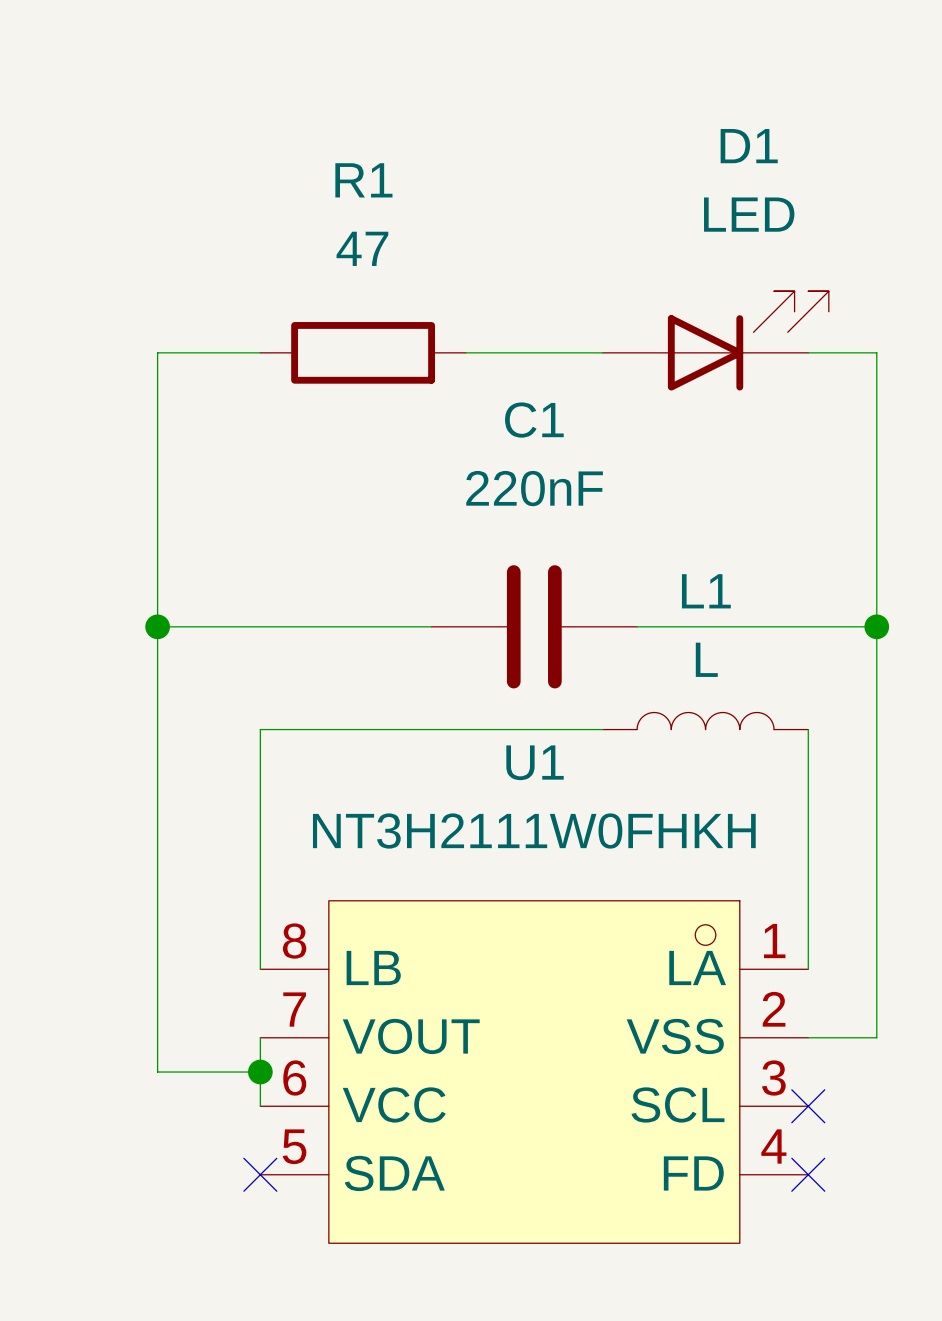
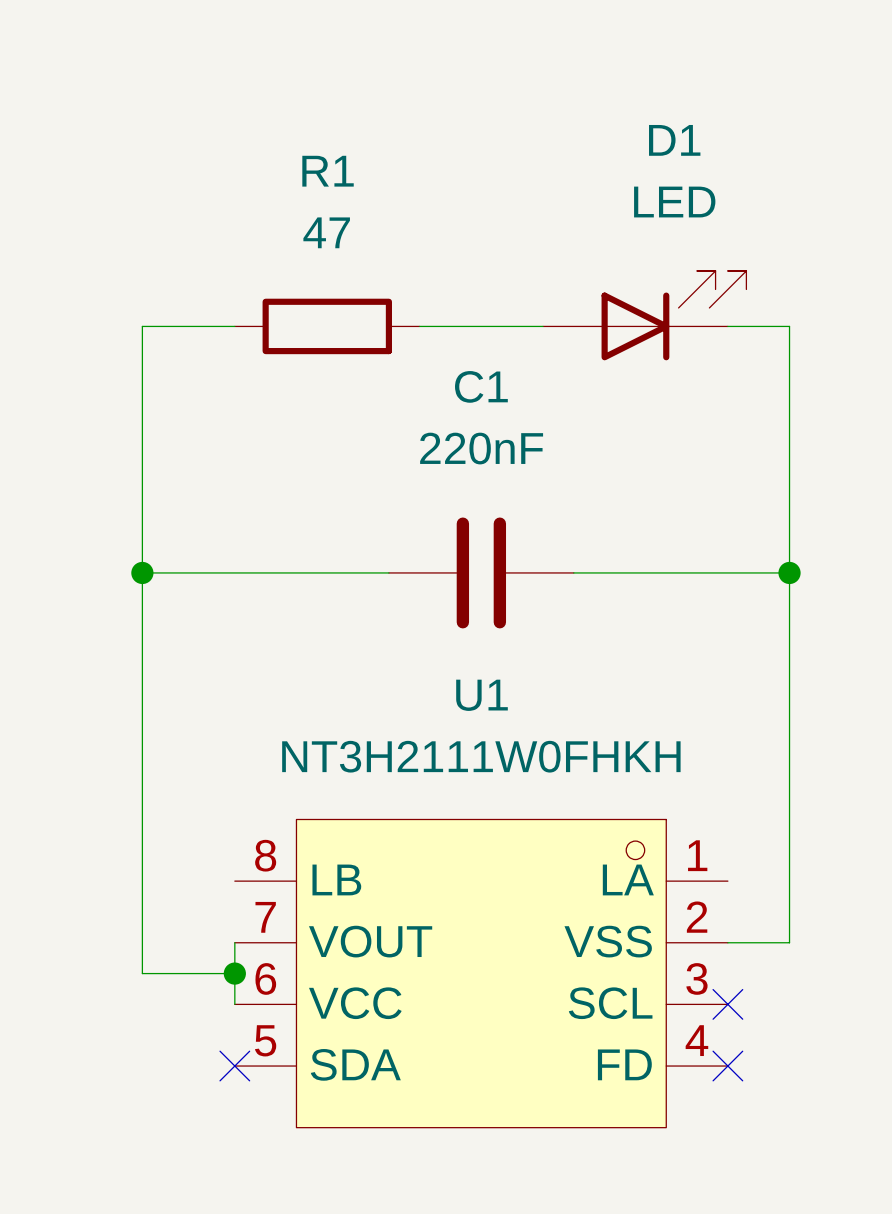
L1: L (705, 721) -> none
wire: (602, 729) (260, 729) (260, 969) -> none
wire: (808, 729) (808, 969) -> none

